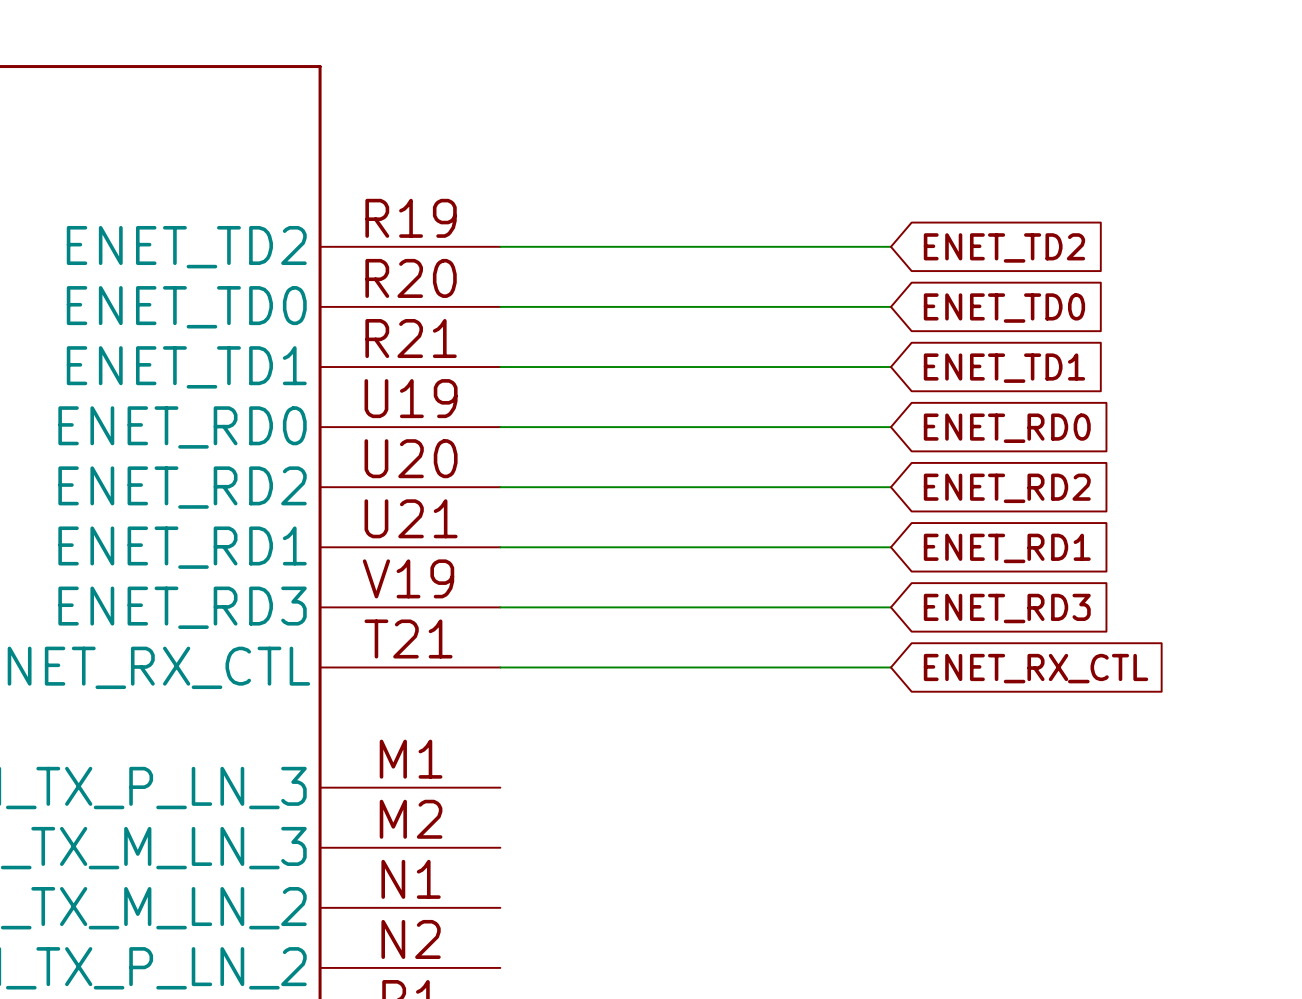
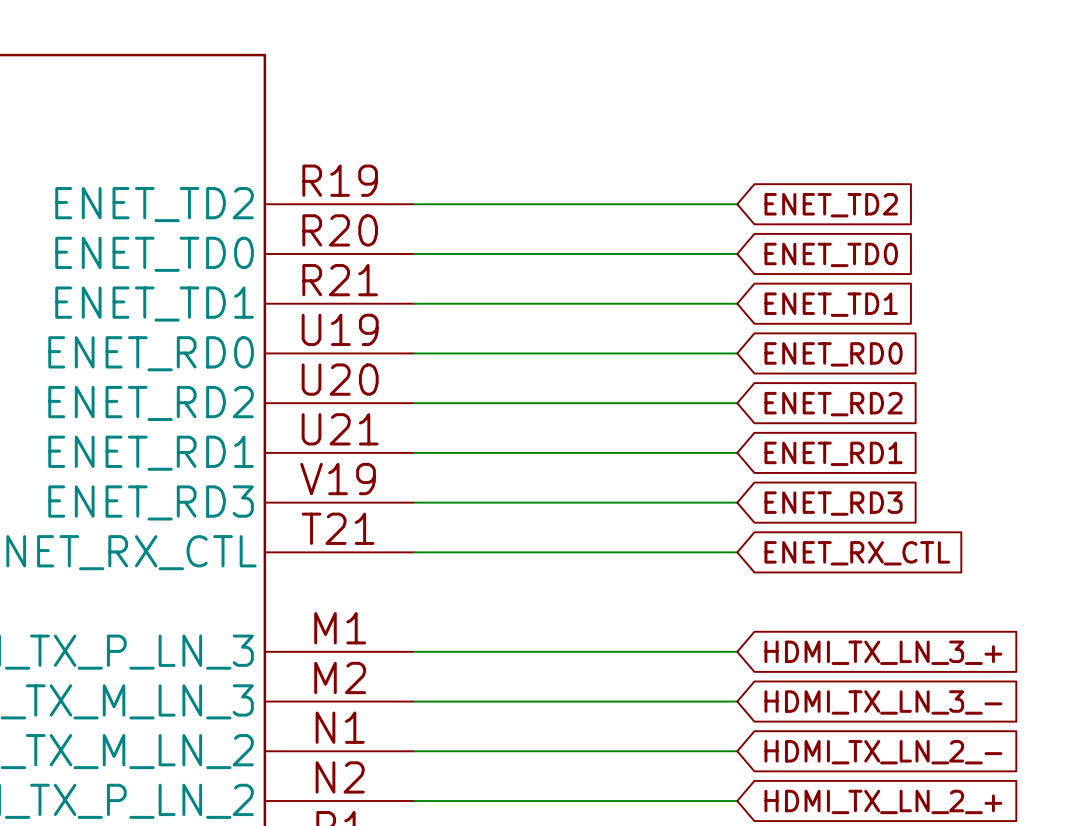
wire: none -> (414, 651) (737, 651)
global label: none -> HDMI_TX_LN_3_+ (883, 652)
wire: none -> (414, 701) (737, 701)
global label: none -> HDMI_TX_LN_3_- (883, 702)
wire: none -> (414, 751) (737, 751)
global label: none -> HDMI_TX_LN_2_- (883, 752)
wire: none -> (414, 801) (737, 801)
global label: none -> HDMI_TX_LN_2_+ (883, 801)

